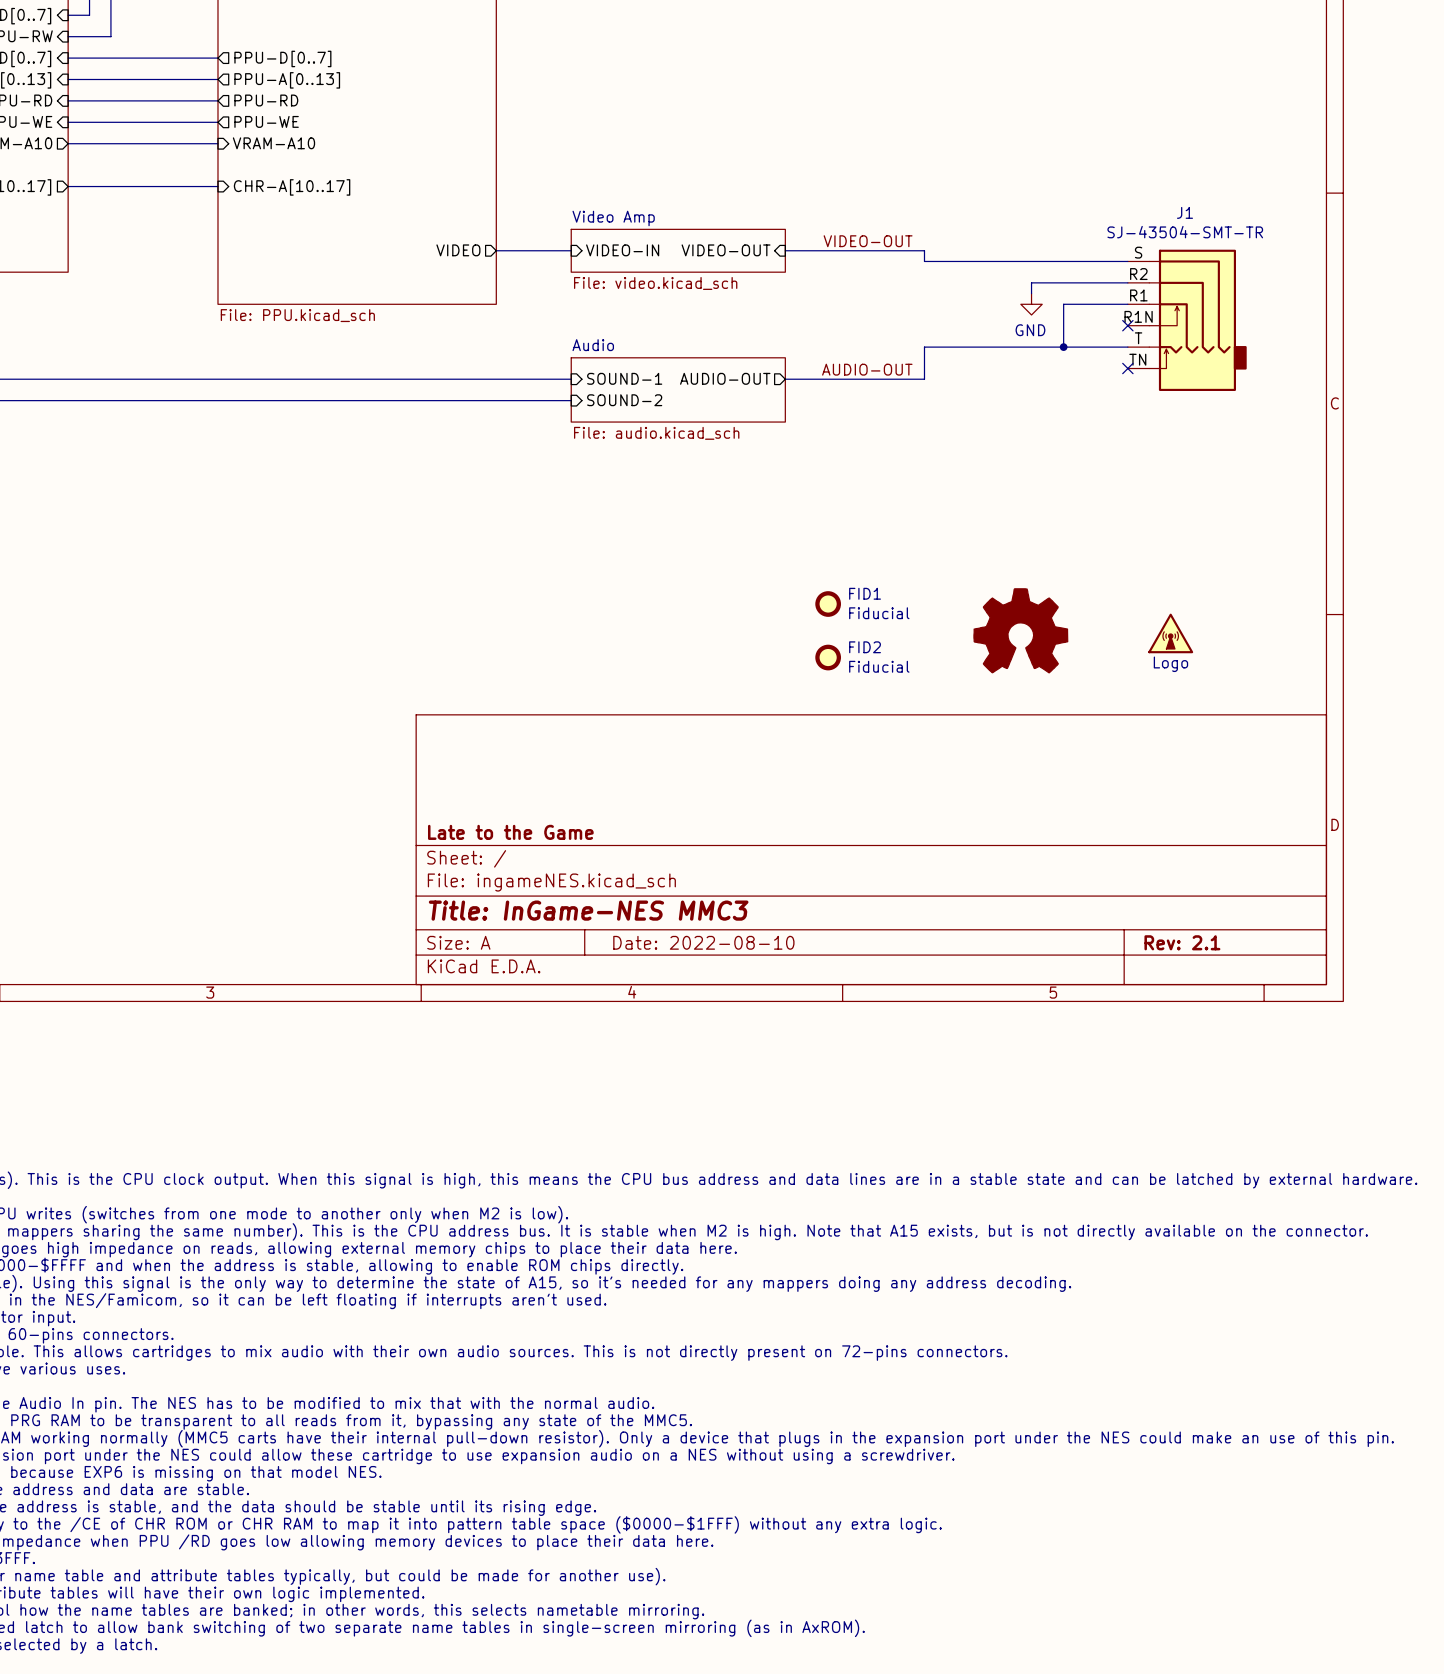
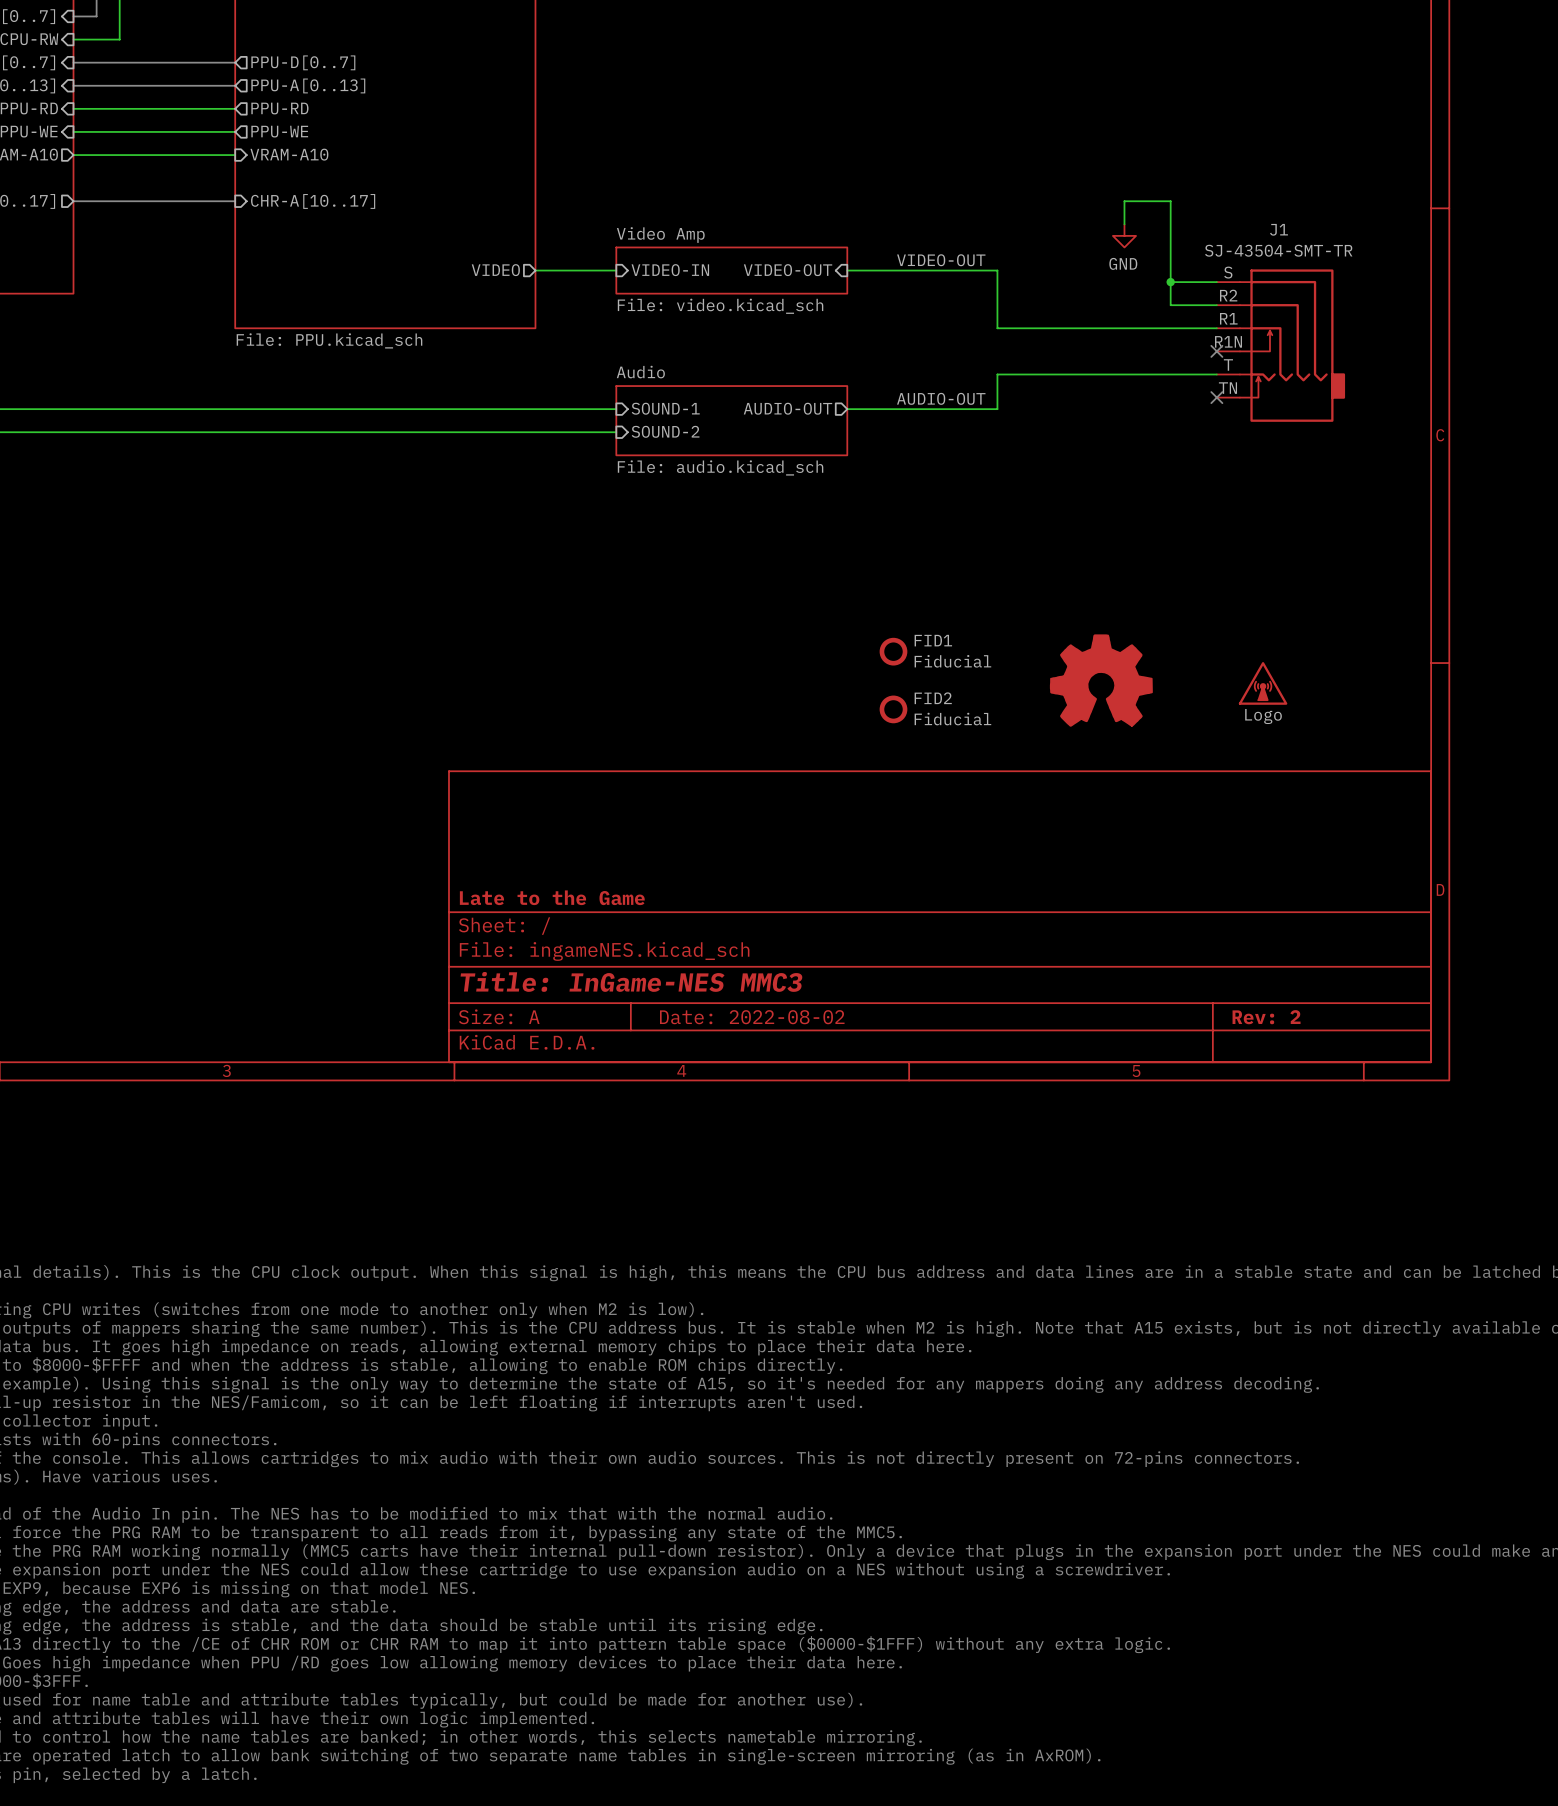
wire: (924, 261) (1085, 261) -> (997, 282) (997, 328) (1147, 328)
junction: none -> (1170, 282)
wire: (1085, 282) (1031, 282) (1031, 293) -> (1170, 305) (1170, 201) (1124, 201) (1124, 224)
power symbol position: GND (1031, 304) -> GND (1124, 235)
wire: (1063, 304) (1063, 347) -> none
junction: (1063, 347) -> none
title block: Date: 2022-08-10 (703, 942) -> Date: 2022-08-02 (752, 1017)
title block: Rev: 2.1 (1182, 942) -> Rev: 2 (1266, 1017)

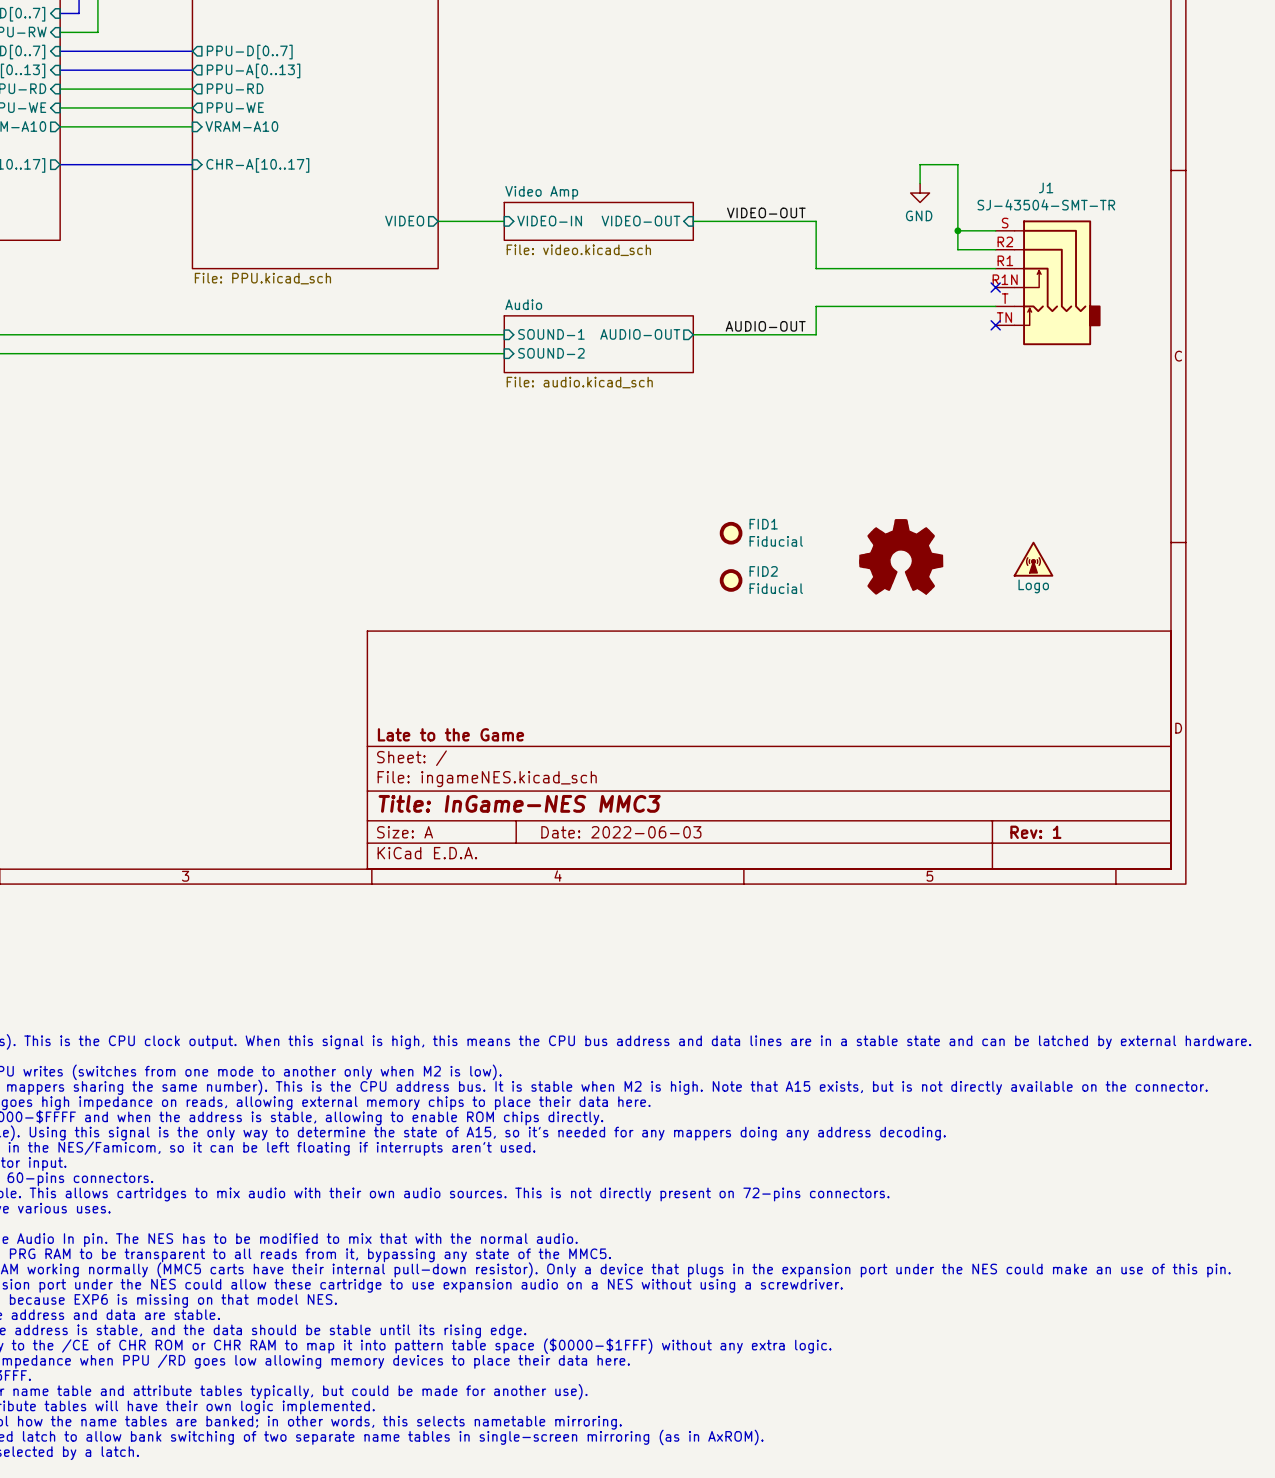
title block: Date: 2022-08-02 (752, 1017) -> Date: 2022-06-03 (621, 832)
title block: Rev: 2 (1266, 1017) -> Rev: 1 (1035, 832)

